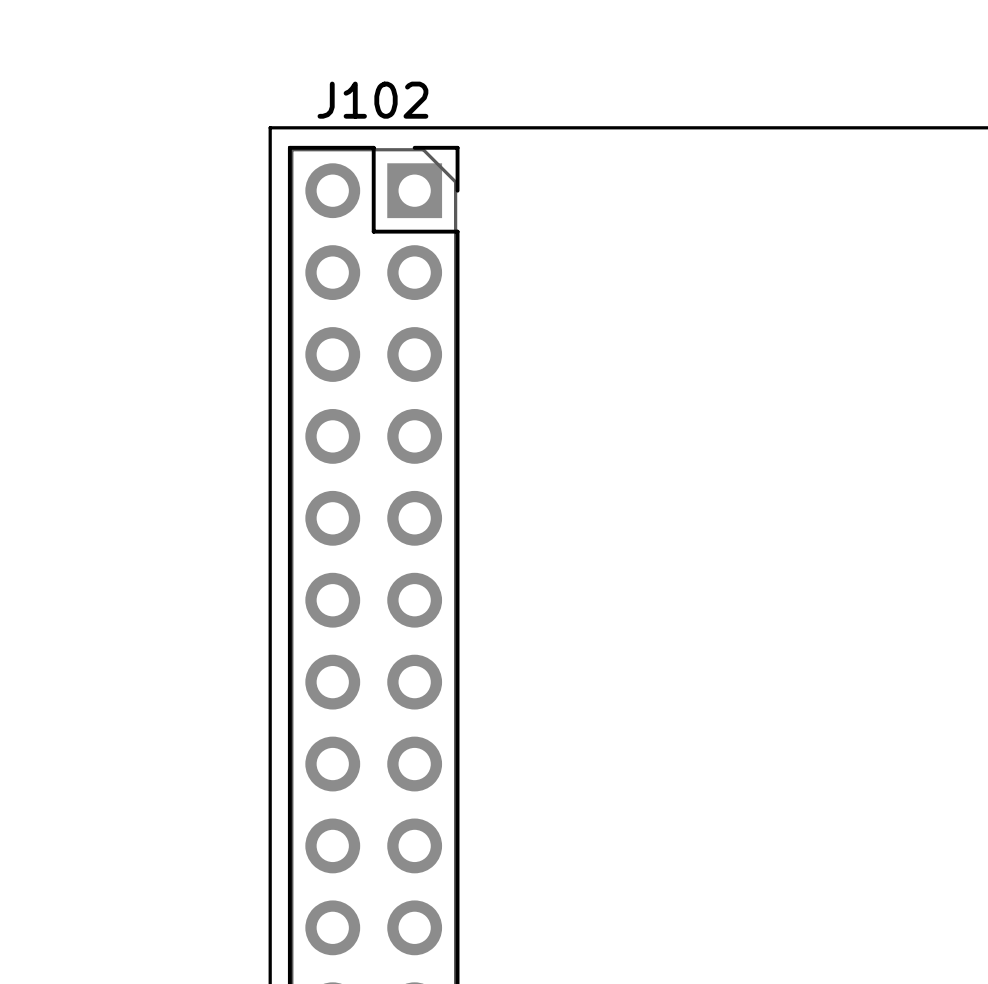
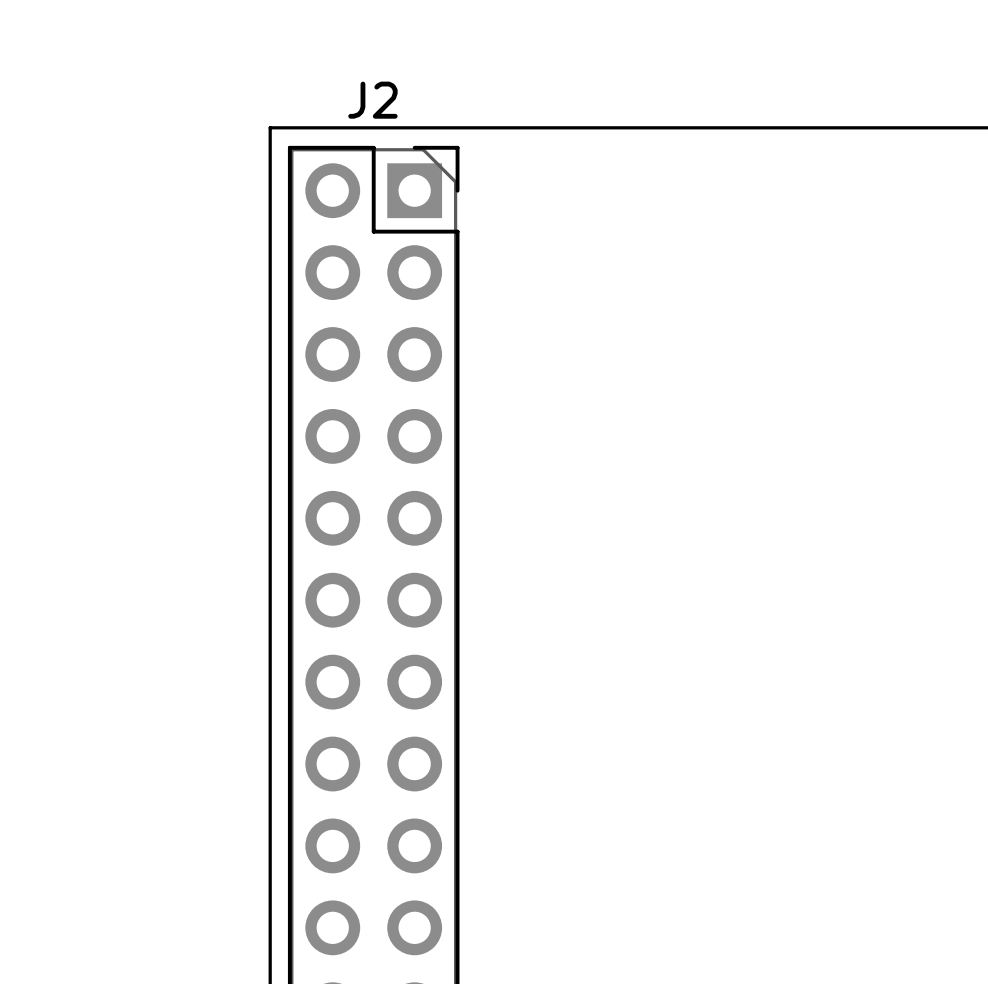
J102 name: J102 (372, 100) -> J2 (372, 100)

